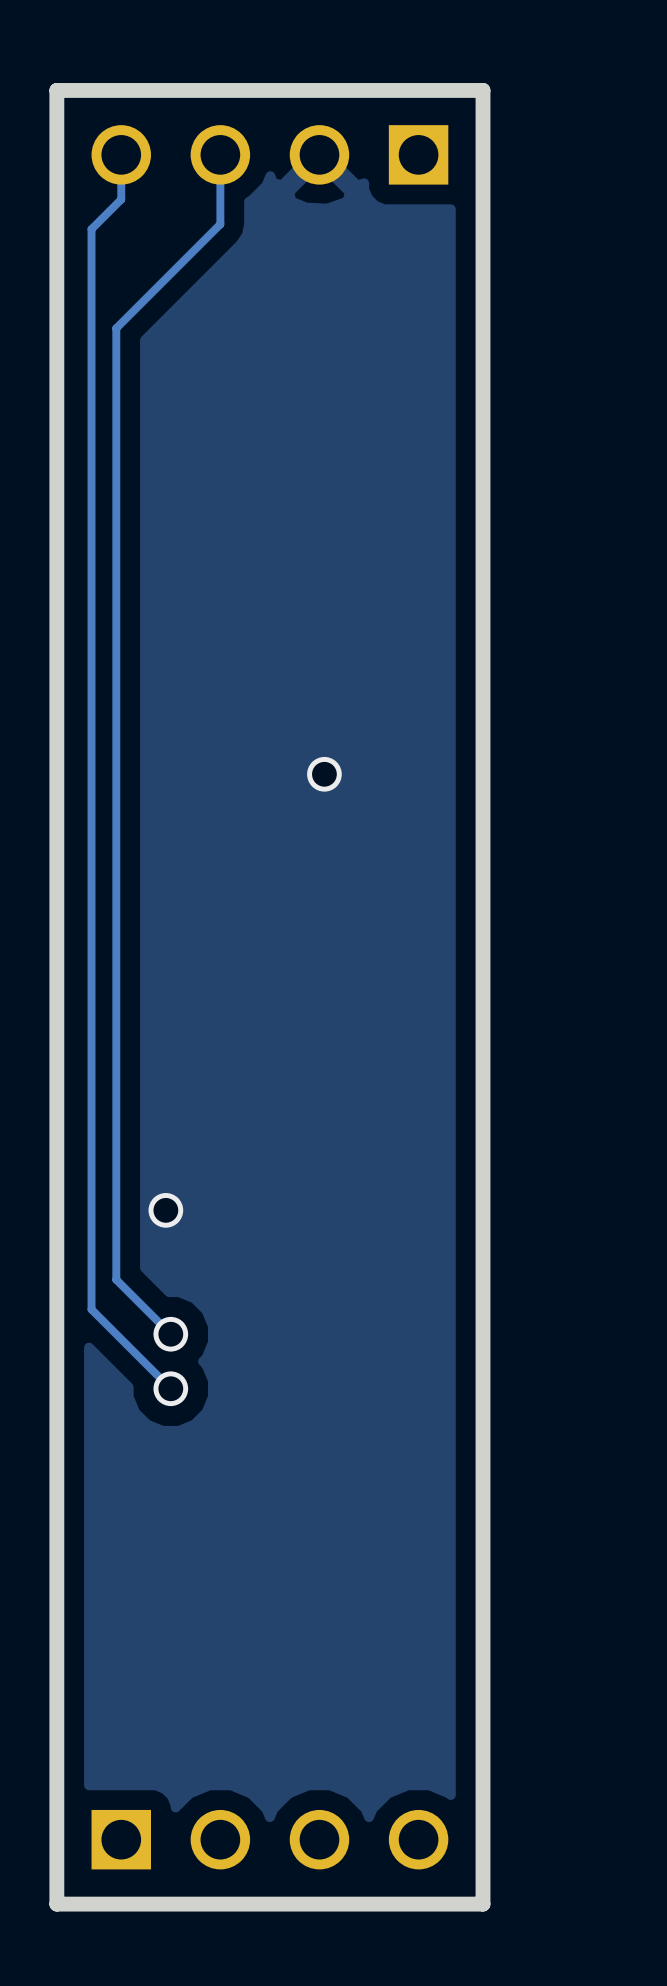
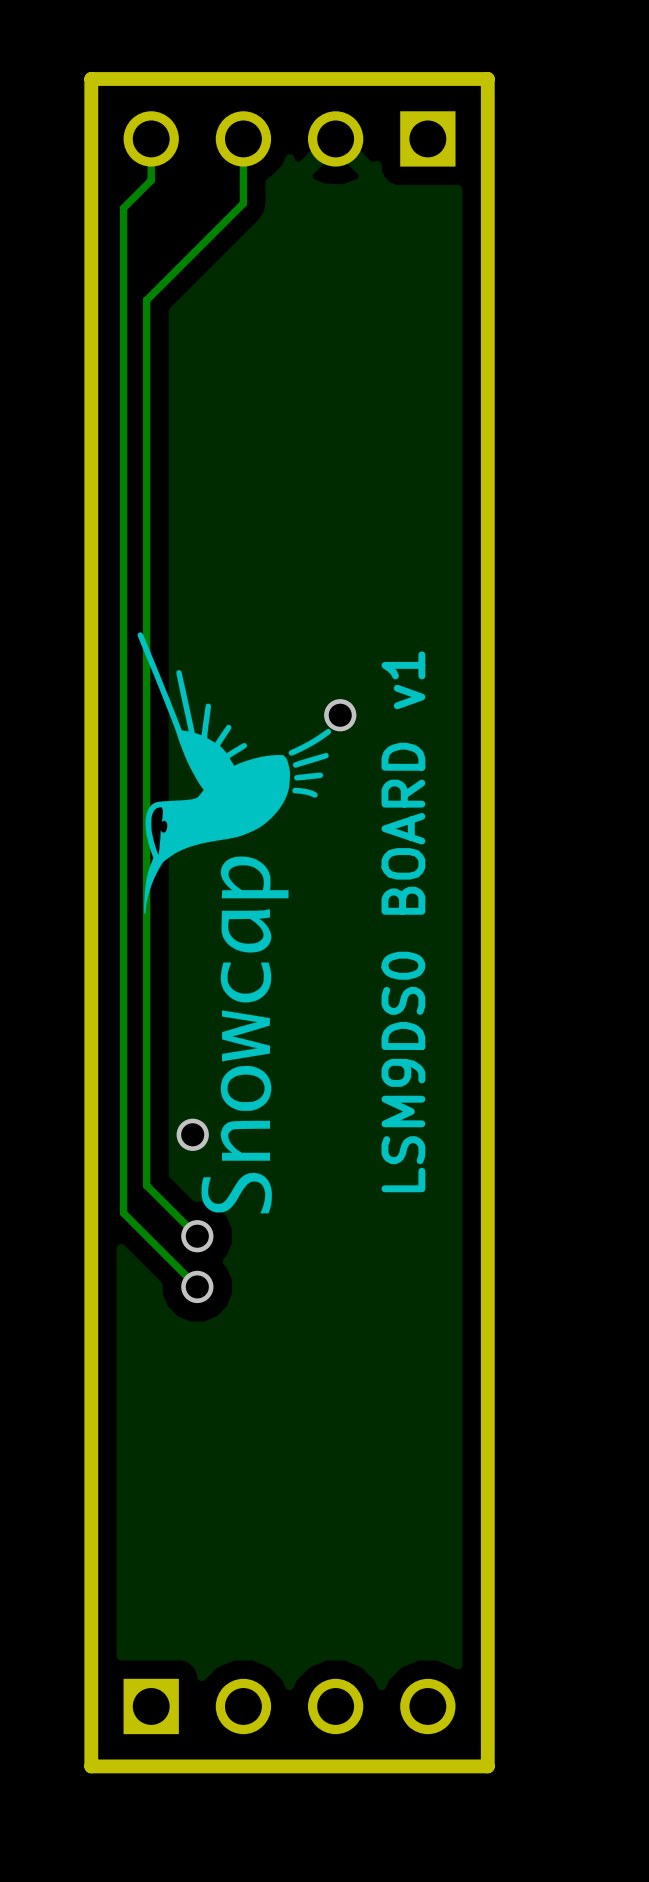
drawing: none -> [137, 632, 332, 1214]
text: none -> LSM9DS0 BOARD v1 (403, 921)
via position: (165, 1210) -> (192, 1134)

